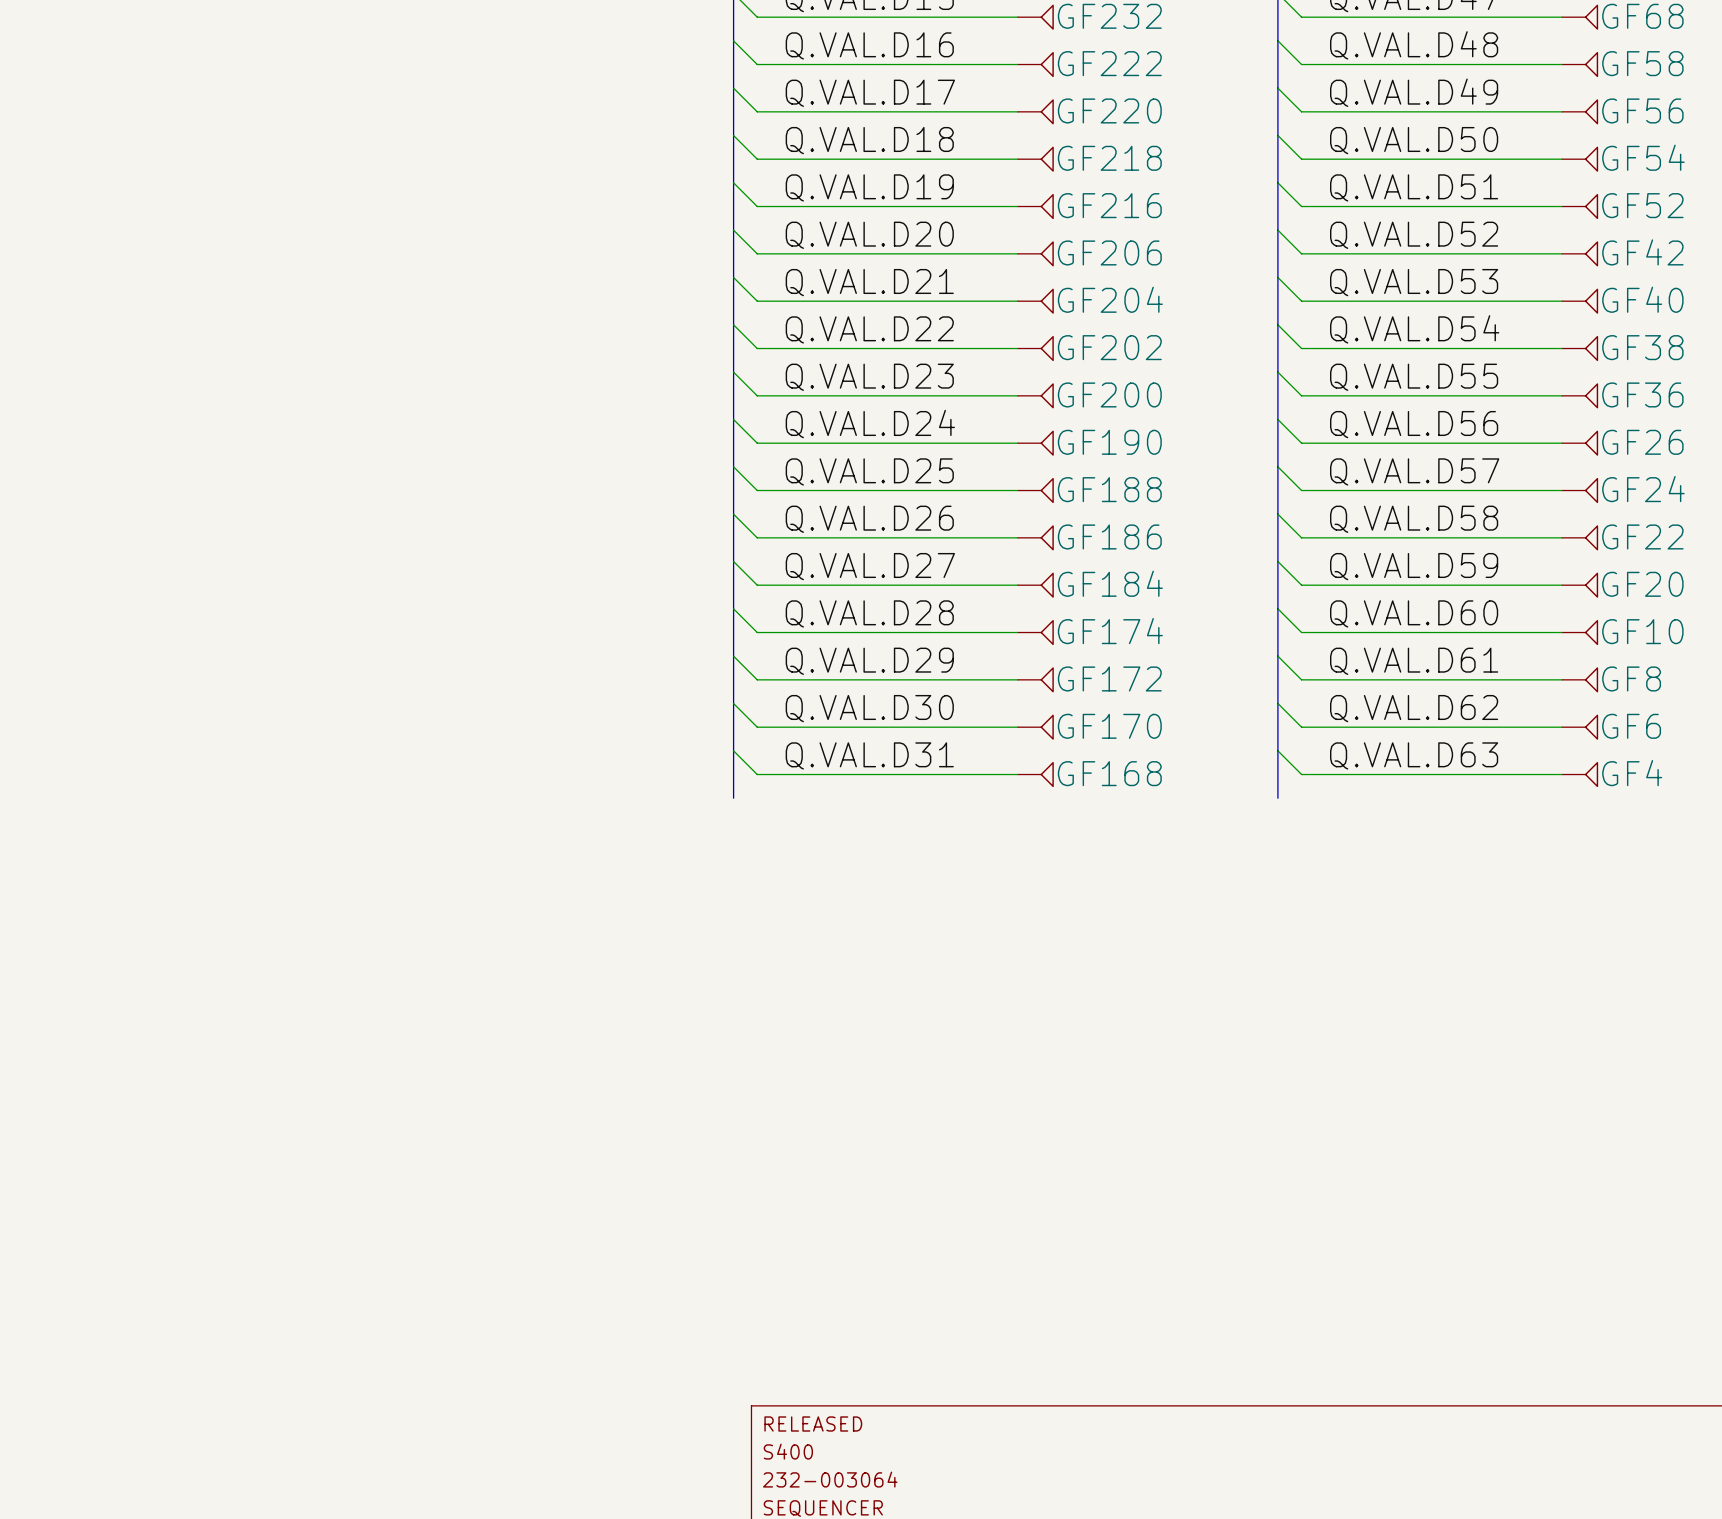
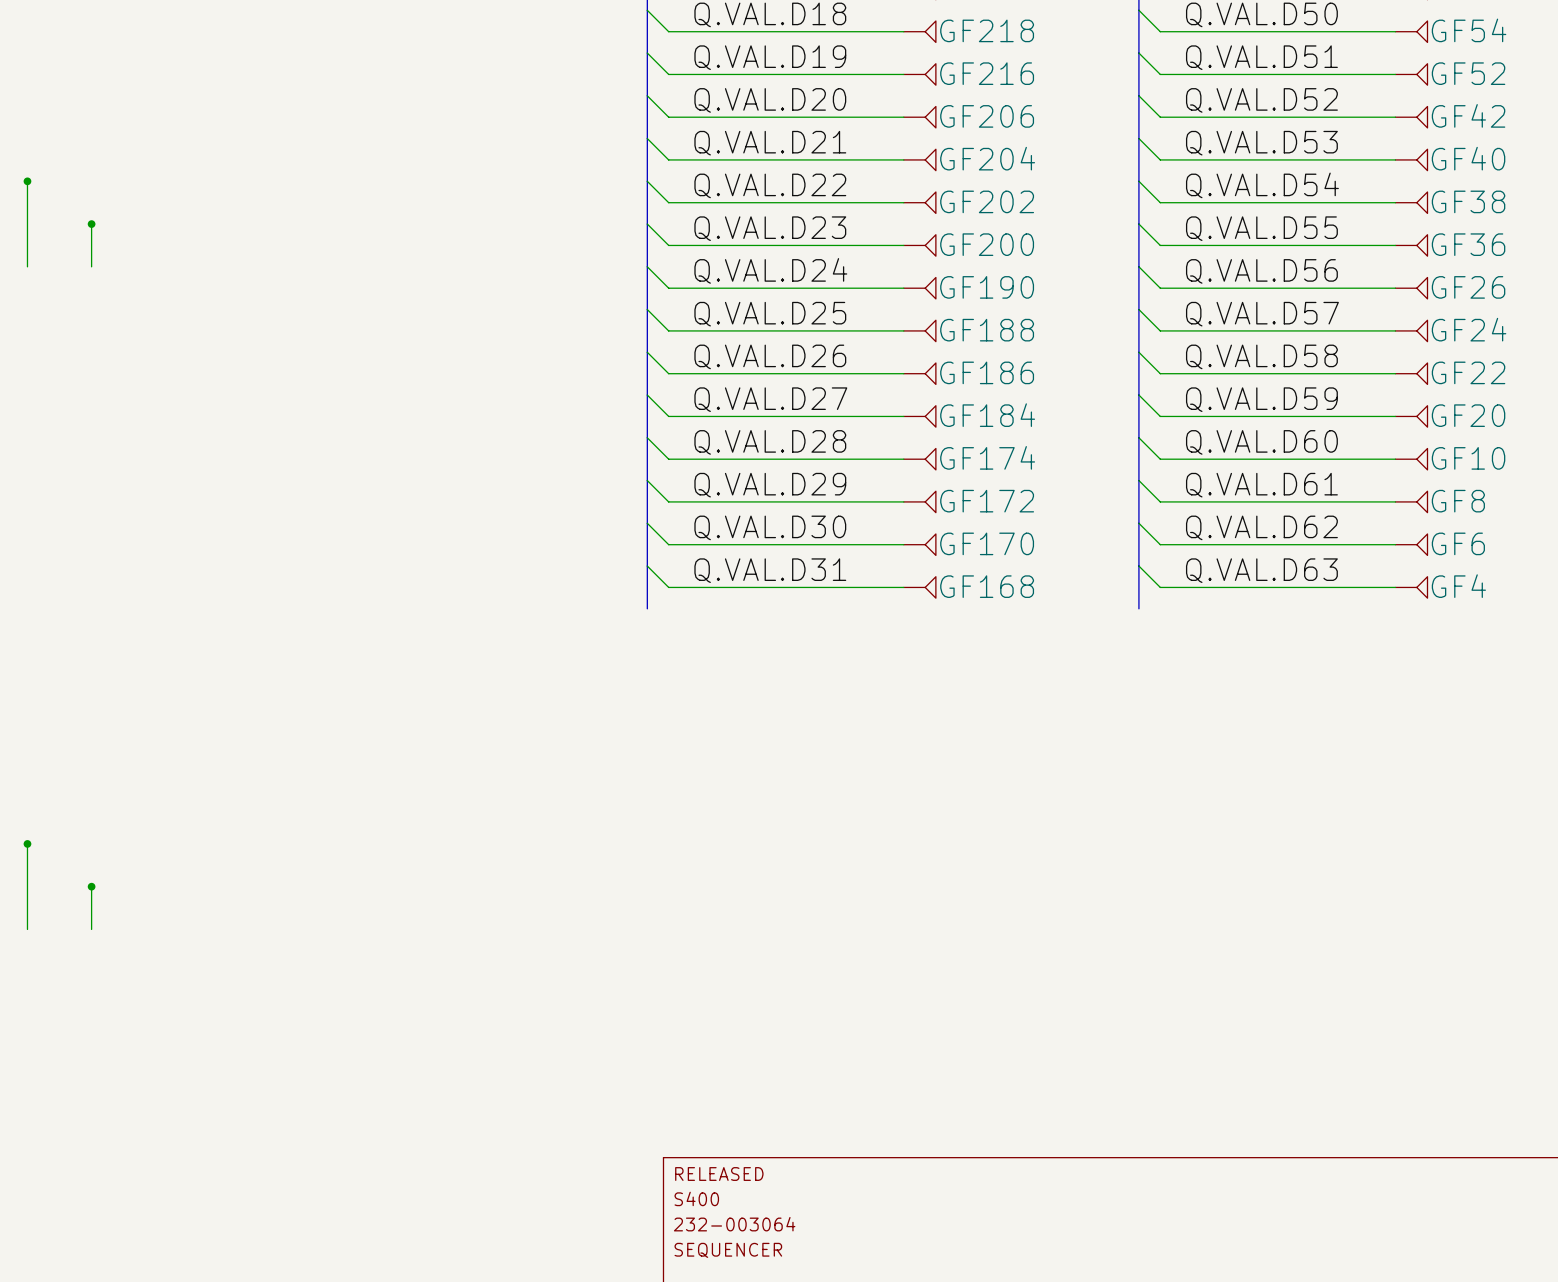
wire: none -> (27, 181) (27, 266)
junction: none -> (27, 181)
wire: none -> (91, 224) (91, 266)
junction: none -> (91, 224)
wire: none -> (27, 843) (27, 929)
junction: none -> (27, 843)
wire: none -> (91, 886) (91, 929)
junction: none -> (91, 886)

